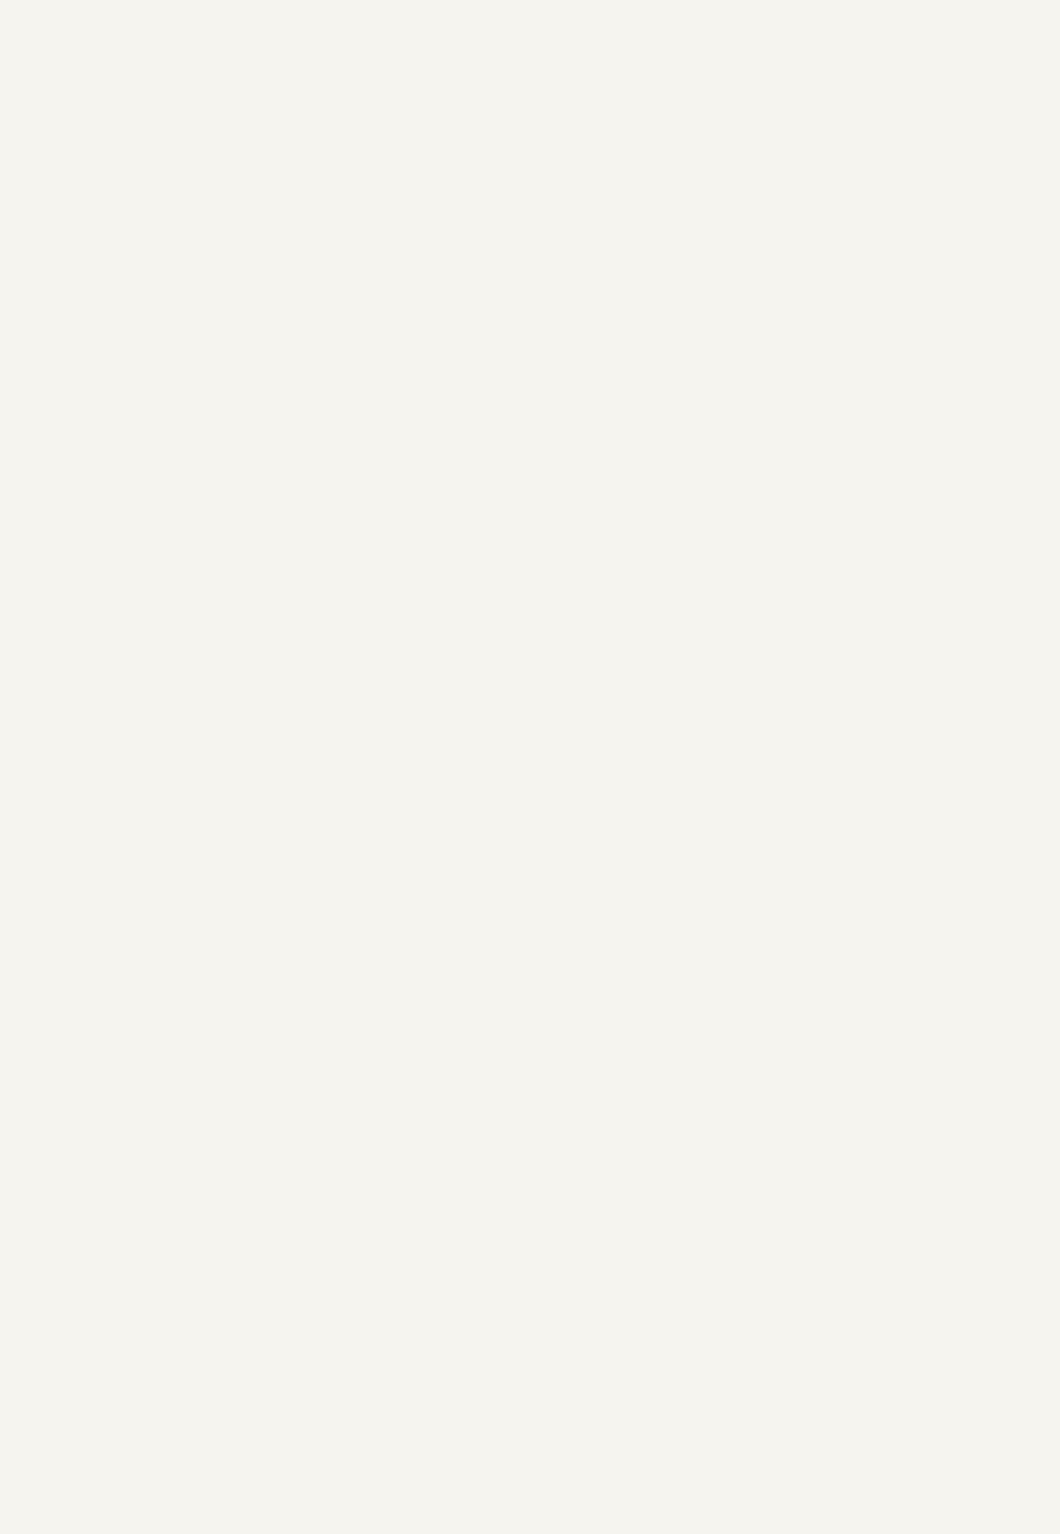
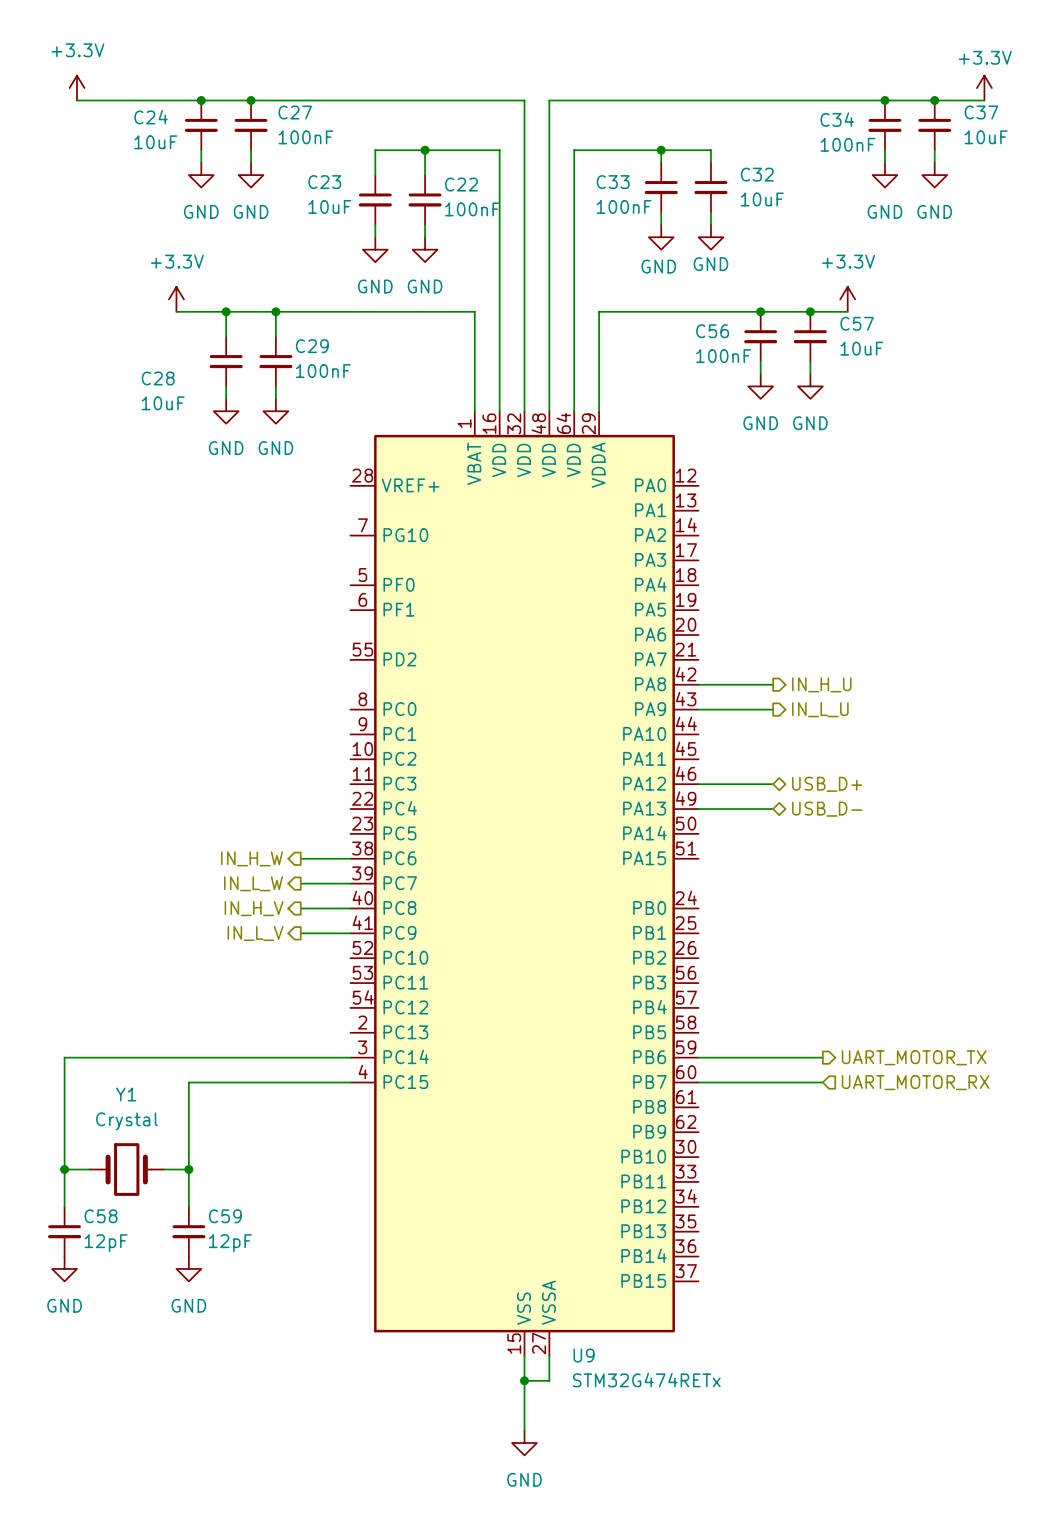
power symbol: none -> +3.3V (77, 88)
power symbol: none -> +3.3V (984, 88)
wire: none -> (77, 100) (524, 100) (524, 411)
junction: none -> (201, 100)
junction: none -> (251, 100)
junction: none -> (884, 100)
junction: none -> (934, 100)
wire: none -> (984, 100) (549, 100) (549, 411)
C24: none -> 10uF (201, 125)
C27: none -> 100nF (251, 125)
C34: none -> 100nF (884, 125)
C37: none -> 10uF (934, 125)
wire: none -> (201, 150) (201, 162)
wire: none -> (251, 150) (251, 162)
wire: none -> (425, 150) (425, 175)
junction: none -> (425, 150)
wire: none -> (661, 150) (661, 162)
junction: none -> (661, 150)
wire: none -> (884, 150) (884, 162)
wire: none -> (934, 150) (934, 162)
wire: none -> (710, 162) (710, 150) (574, 150) (574, 411)
power symbol: none -> GND (201, 175)
power symbol: none -> GND (251, 175)
wire: none -> (375, 175) (375, 150) (499, 150) (499, 411)
power symbol: none -> GND (884, 175)
power symbol: none -> GND (934, 175)
C33: none -> 100nF (661, 187)
C32: none -> 10uF (710, 187)
C23: none -> 10uF (375, 199)
C22: none -> 100nF (425, 199)
wire: none -> (661, 212) (661, 224)
wire: none -> (710, 212) (710, 224)
wire: none -> (375, 224) (375, 237)
wire: none -> (425, 224) (425, 237)
power symbol: none -> GND (661, 237)
power symbol: none -> GND (710, 237)
power symbol: none -> GND (375, 249)
power symbol: none -> GND (425, 249)
power symbol: none -> +3.3V (176, 299)
power symbol: none -> +3.3V (847, 299)
wire: none -> (176, 311) (474, 311) (474, 411)
wire: none -> (226, 311) (226, 336)
junction: none -> (226, 311)
wire: none -> (275, 311) (275, 336)
junction: none -> (275, 311)
junction: none -> (760, 311)
junction: none -> (810, 311)
wire: none -> (847, 311) (599, 311) (599, 411)
C56: none -> 100nF (760, 336)
C57: none -> 10uF (810, 336)
C28: none -> 10uF (226, 361)
C29: none -> 100nF (275, 361)
wire: none -> (760, 361) (760, 373)
wire: none -> (810, 361) (810, 373)
wire: none -> (226, 386) (226, 398)
wire: none -> (275, 386) (275, 398)
power symbol: none -> GND (760, 386)
power symbol: none -> GND (810, 386)
power symbol: none -> GND (226, 411)
power symbol: none -> GND (275, 411)
wire: none -> (698, 684) (773, 684)
hierarchical label: none -> IN_H_U (821, 684)
wire: none -> (698, 709) (773, 709)
hierarchical label: none -> IN_L_U (820, 709)
wire: none -> (698, 784) (773, 784)
hierarchical label: none -> USB_D+ (827, 784)
wire: none -> (698, 809) (773, 809)
hierarchical label: none -> USB_D- (827, 809)
hierarchical label: none -> IN_H_W (252, 858)
wire: none -> (300, 858) (350, 858)
hierarchical label: none -> IN_L_W (253, 883)
wire: none -> (300, 883) (350, 883)
U9: none -> STM32G474RETx (524, 883)
hierarchical label: none -> IN_H_V (254, 908)
wire: none -> (300, 908) (350, 908)
hierarchical label: none -> IN_L_V (255, 933)
wire: none -> (300, 933) (350, 933)
wire: none -> (350, 1057) (64, 1057) (64, 1206)
wire: none -> (698, 1057) (822, 1057)
hierarchical label: none -> UART_MOTOR_TX (914, 1057)
wire: none -> (350, 1082) (188, 1082) (188, 1206)
wire: none -> (698, 1082) (822, 1082)
hierarchical label: none -> UART_MOTOR_RX (915, 1082)
wire: none -> (64, 1169) (89, 1169)
junction: none -> (64, 1169)
Y1: none -> Crystal (126, 1169)
wire: none -> (164, 1169) (188, 1169)
junction: none -> (188, 1169)
C58: none -> 12pF (64, 1231)
C59: none -> 12pF (188, 1231)
power symbol: none -> GND (64, 1268)
power symbol: none -> GND (188, 1268)
wire: none -> (524, 1355) (524, 1430)
wire: none -> (549, 1355) (549, 1380) (524, 1380)
junction: none -> (524, 1380)
power symbol: none -> GND (524, 1442)

